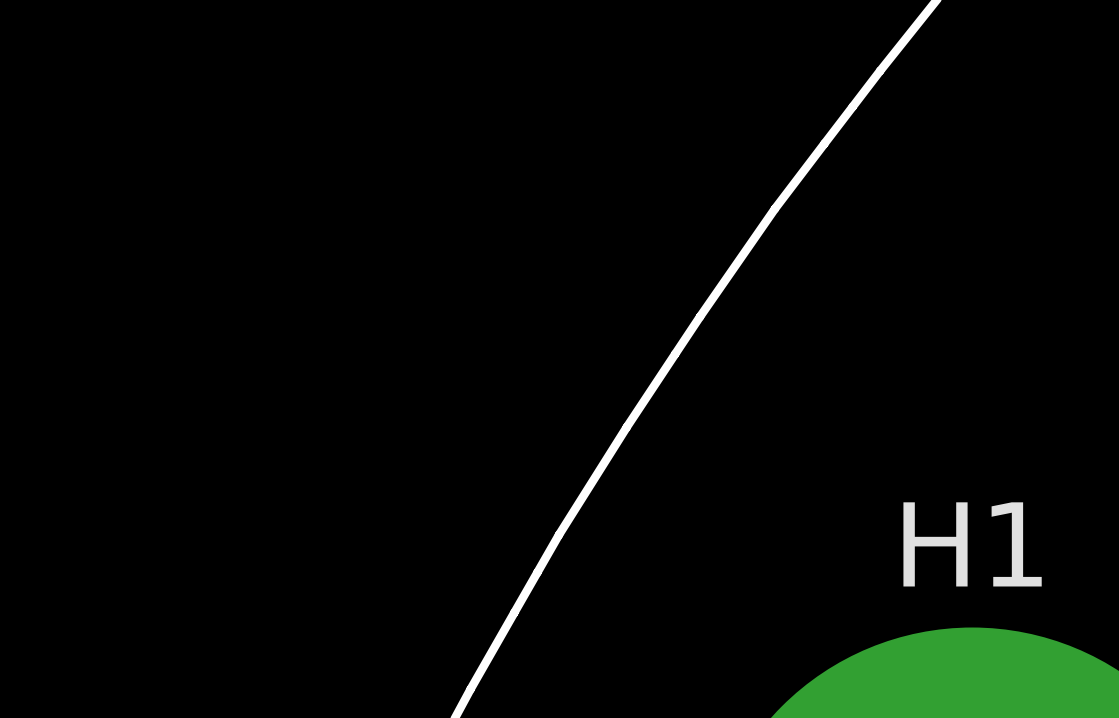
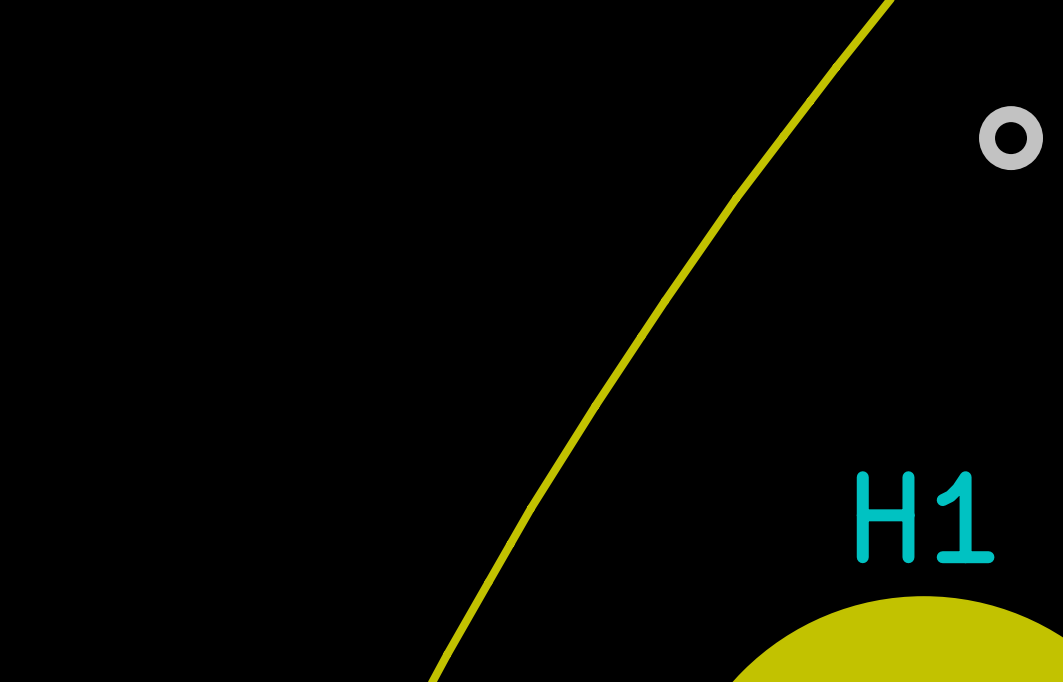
via: none -> (1011, 138)

